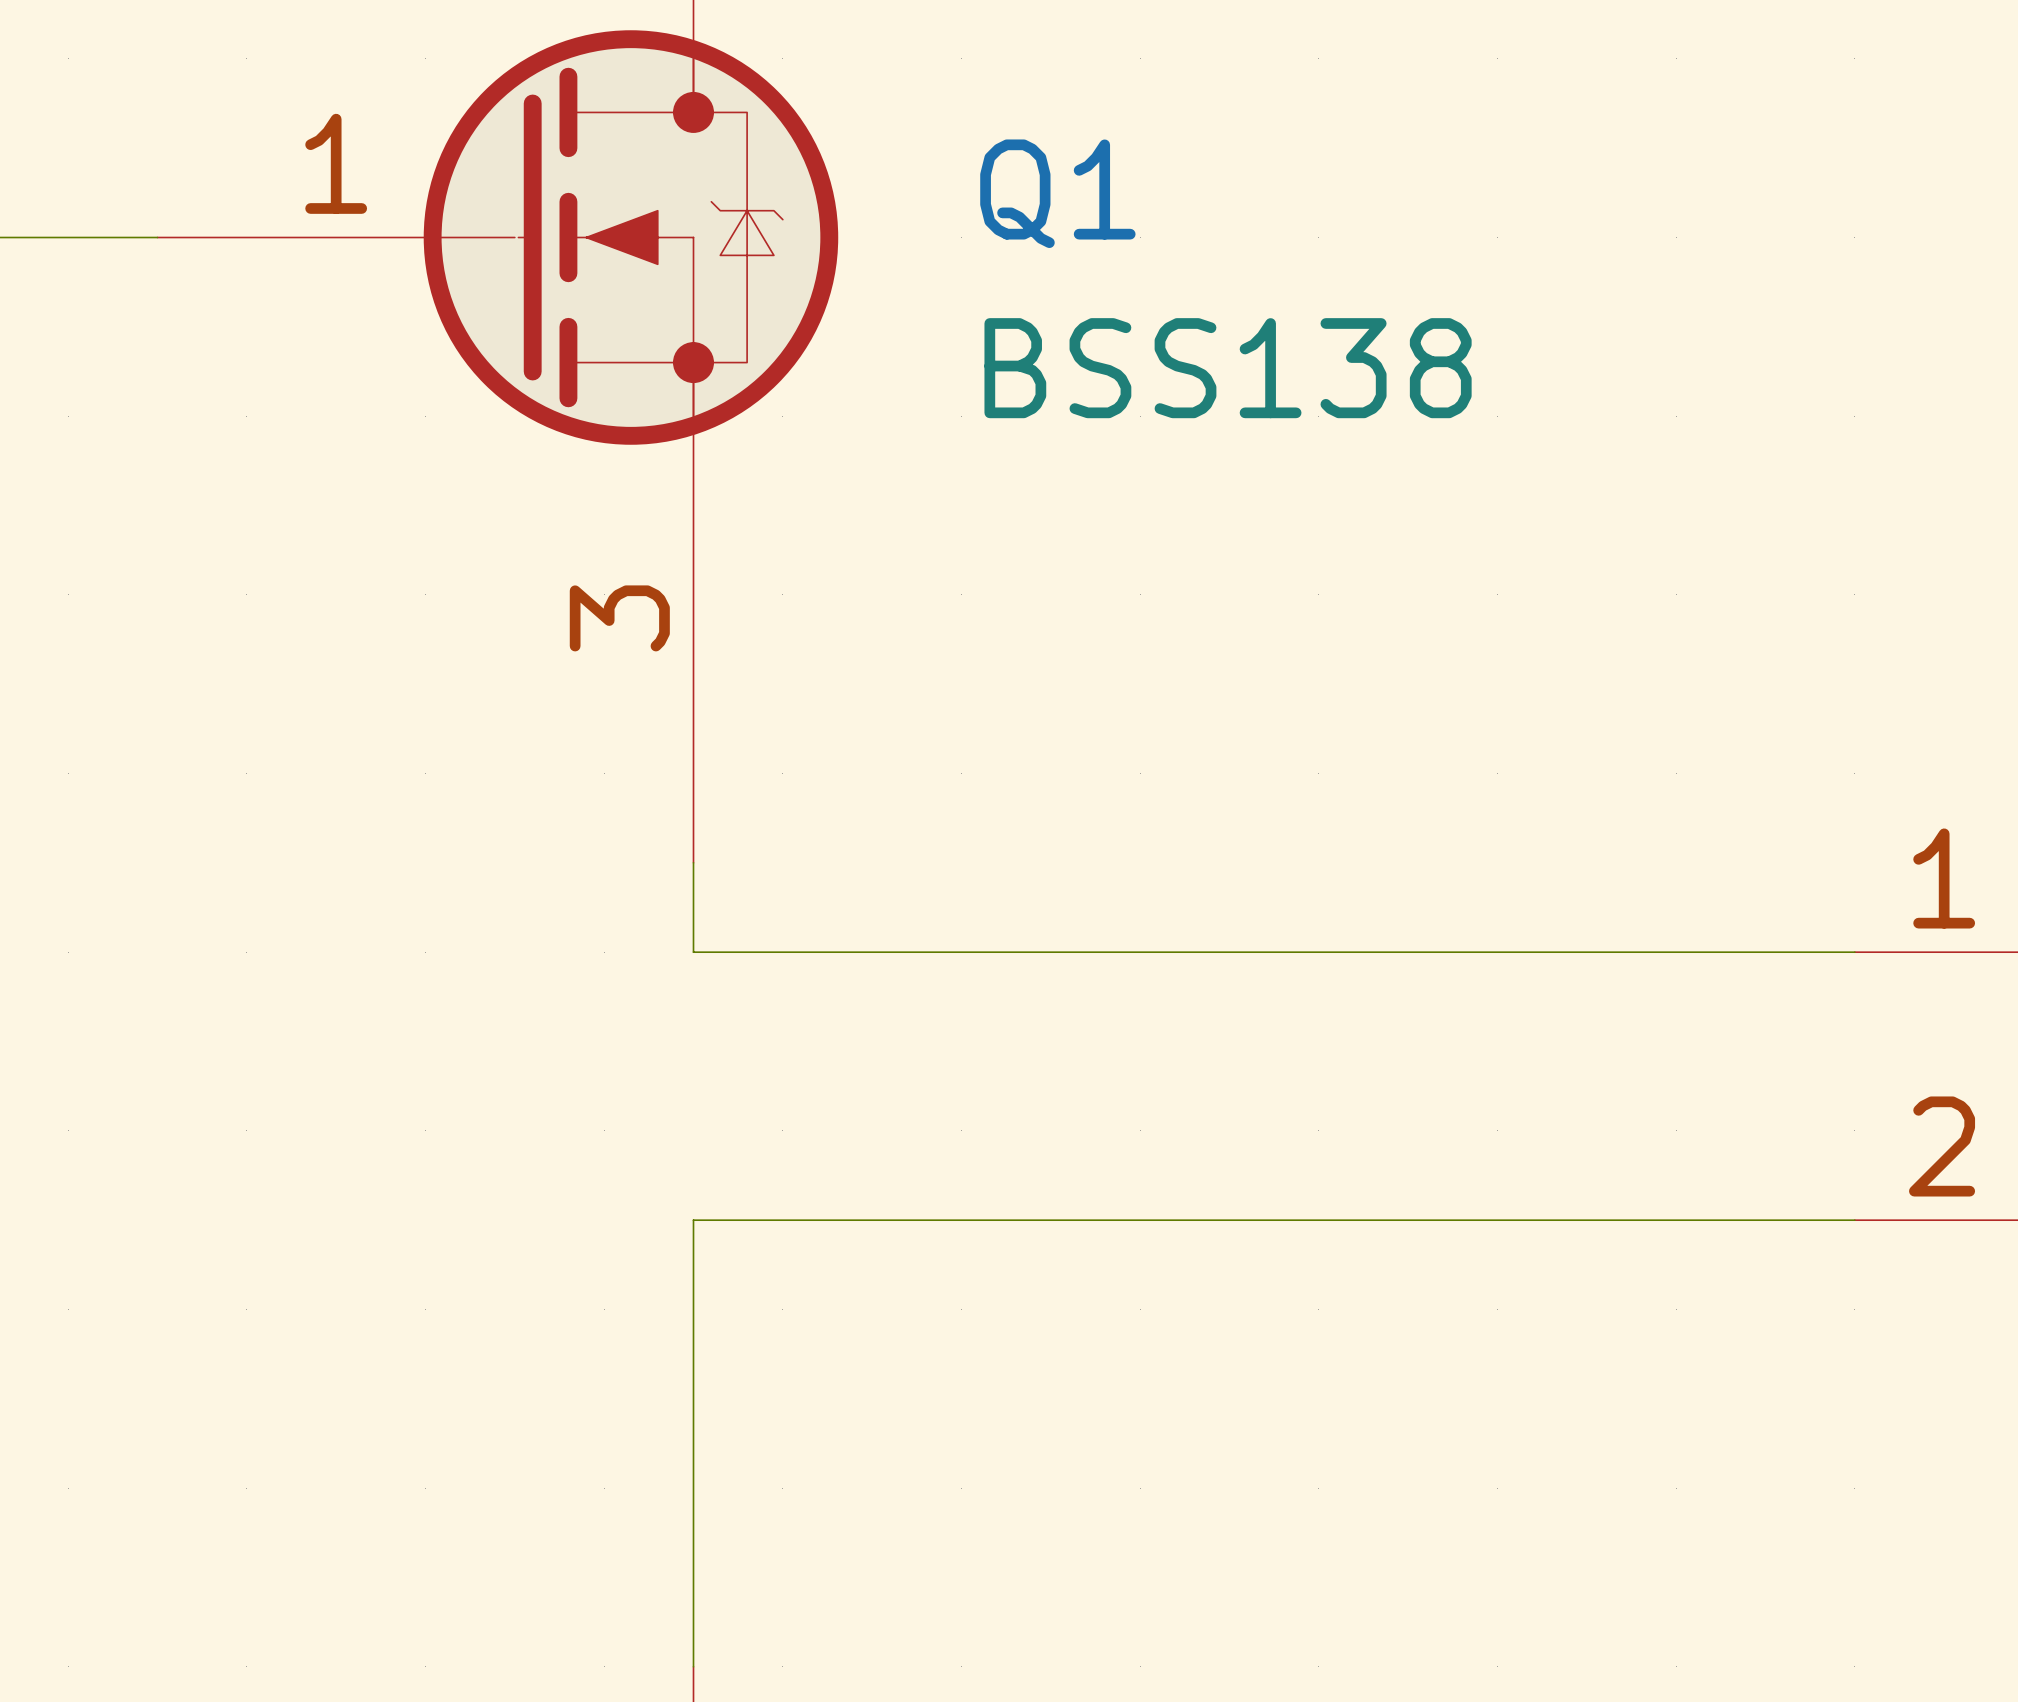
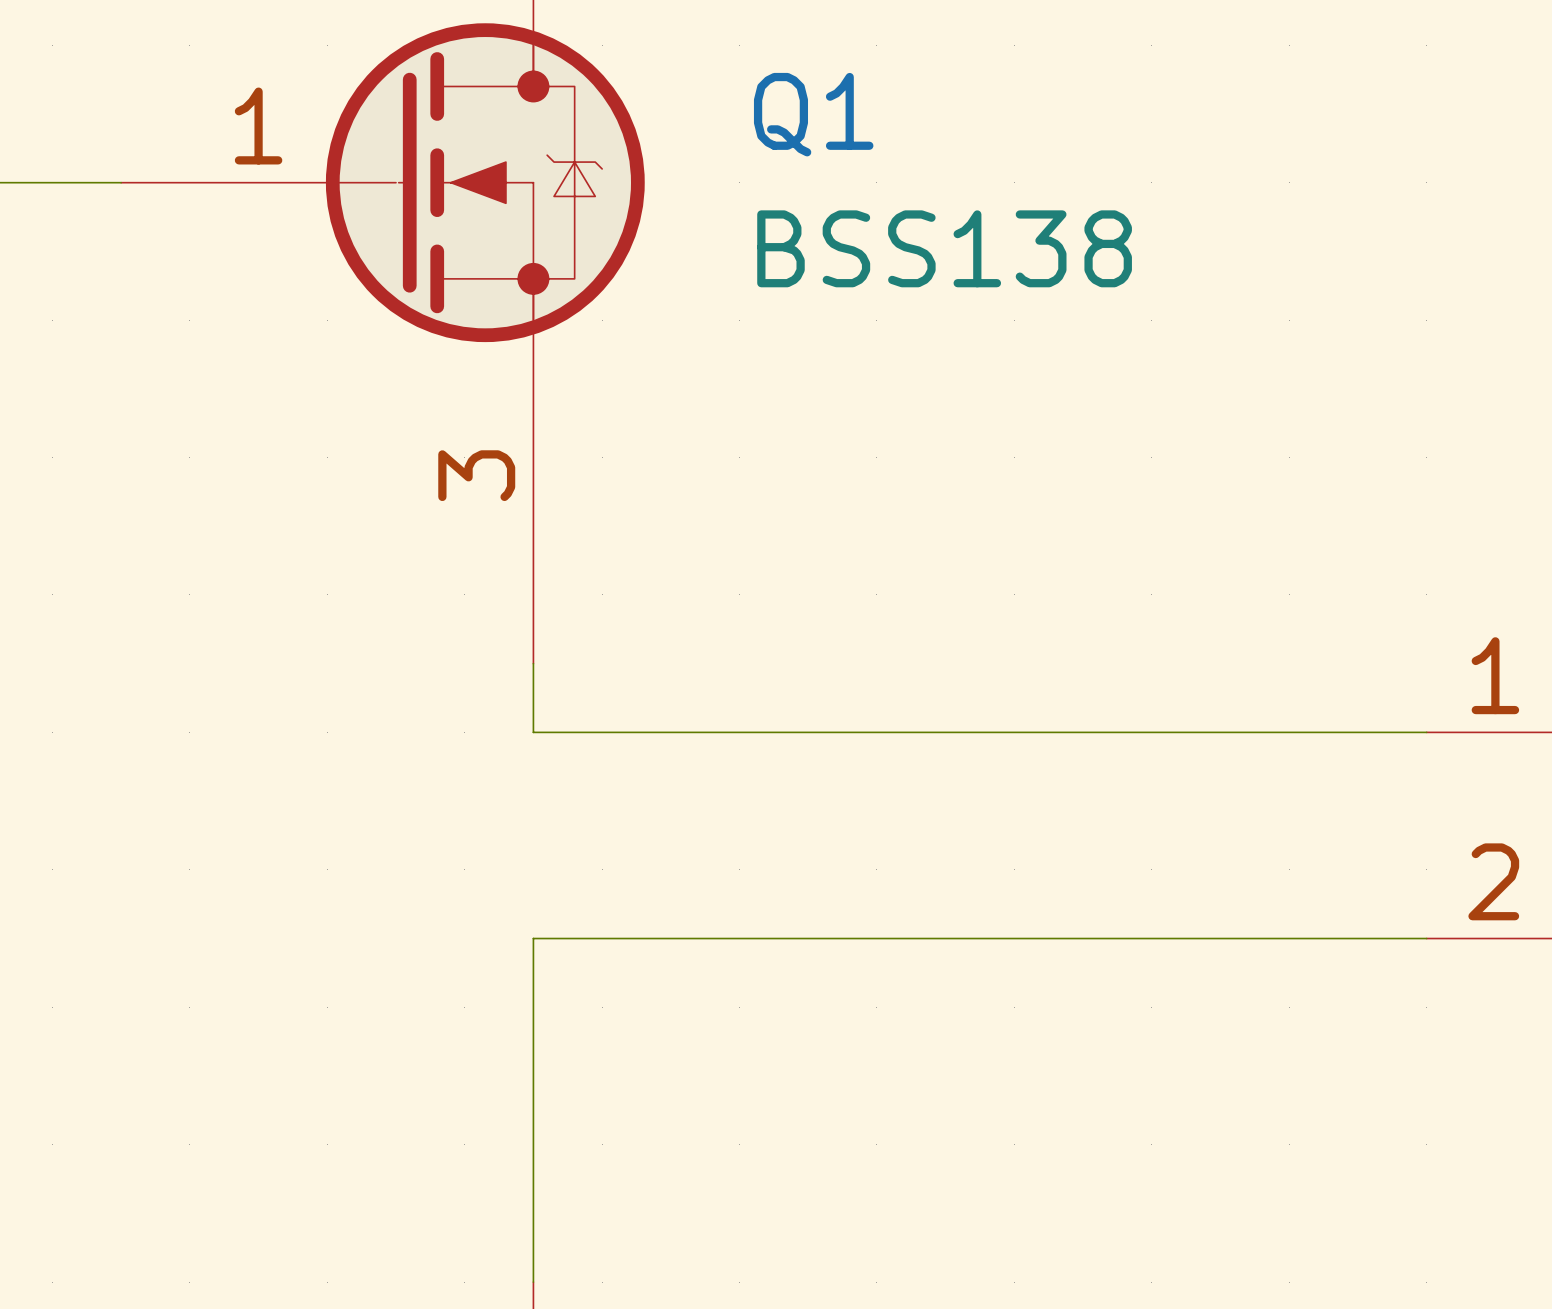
Q1 name position: Q1 (1057, 193) -> Q1 (813, 114)
Q1 value position: BSS138 (1228, 368) -> BSS138 (944, 248)

